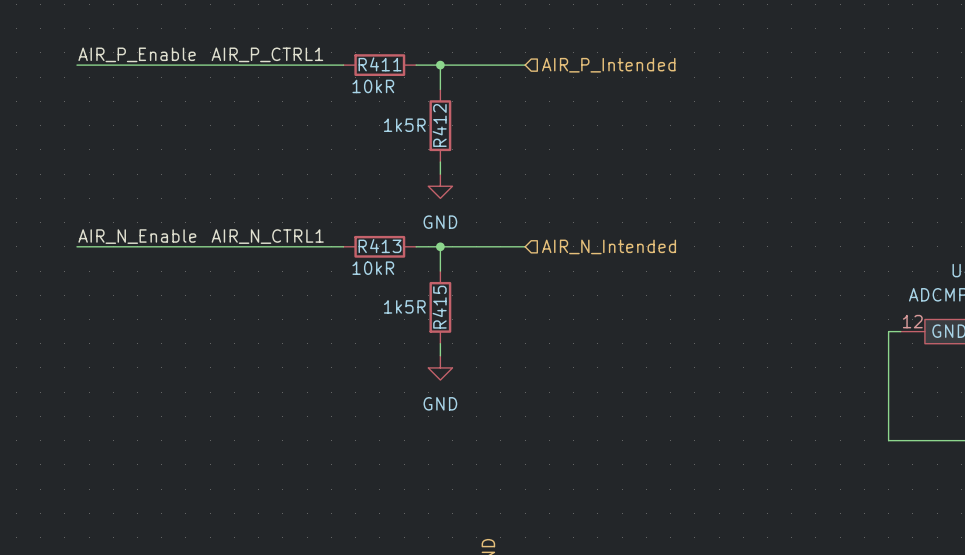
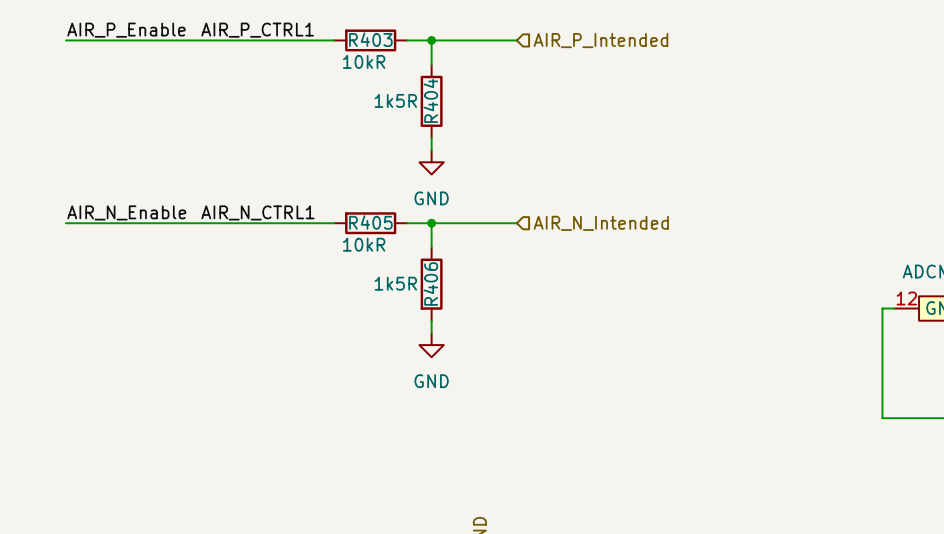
R411 name: R411 (380, 64) -> R403 (370, 39)
R412 name: R412 (439, 125) -> R404 (430, 100)
R413 name: R413 (380, 246) -> R405 (370, 222)
R415 name: R415 (439, 307) -> R406 (430, 283)

